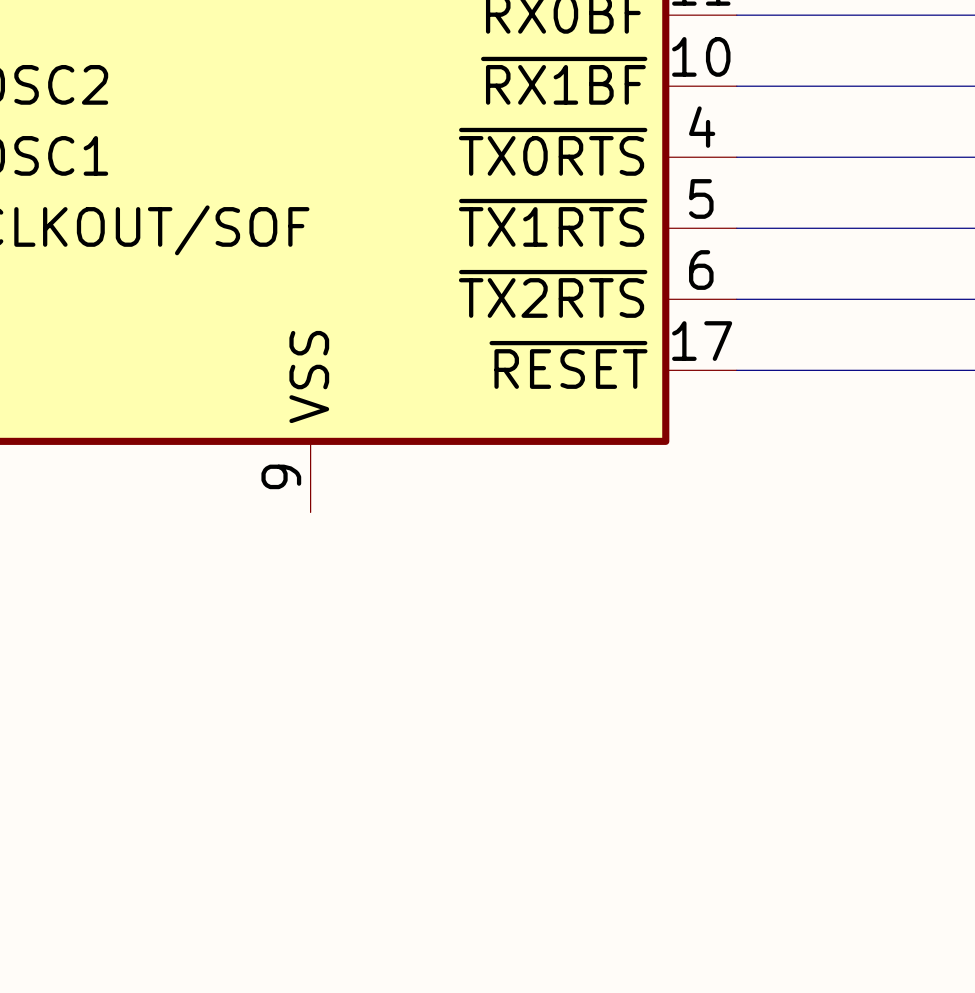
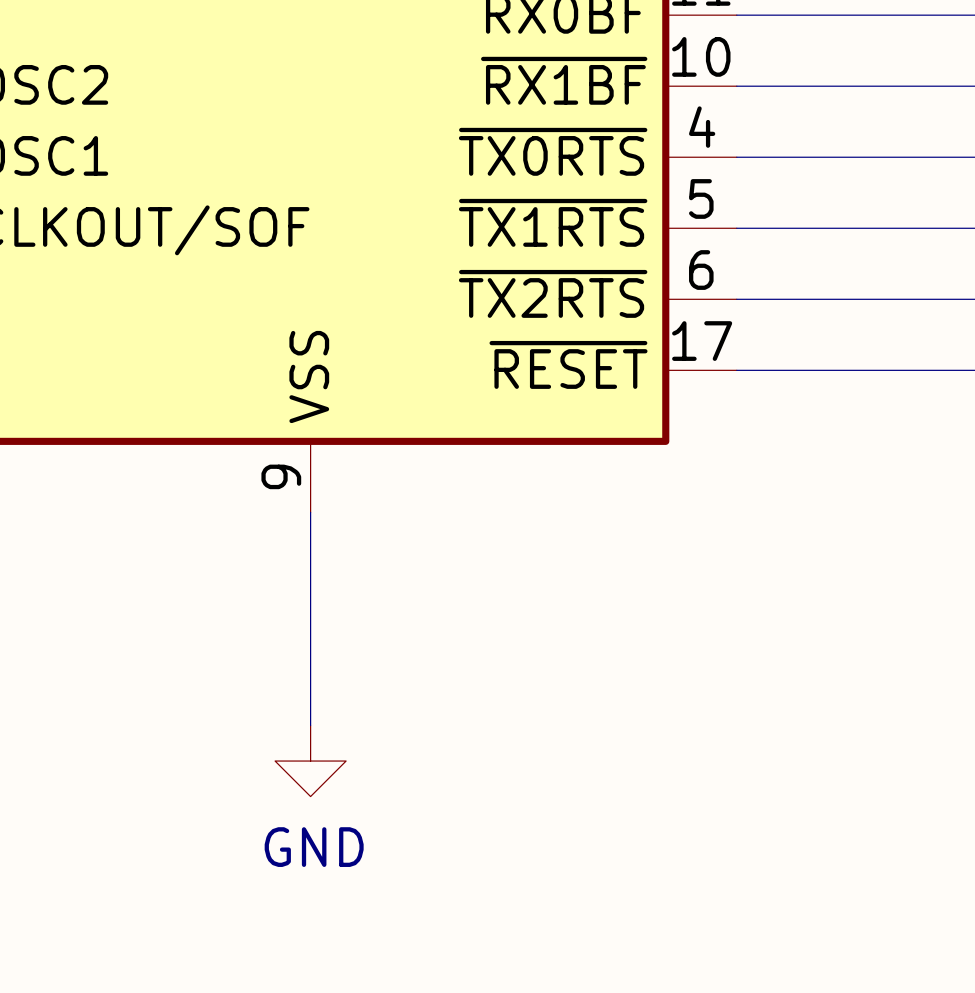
wire: none -> (310, 512) (310, 725)
power symbol: none -> GND (310, 761)

